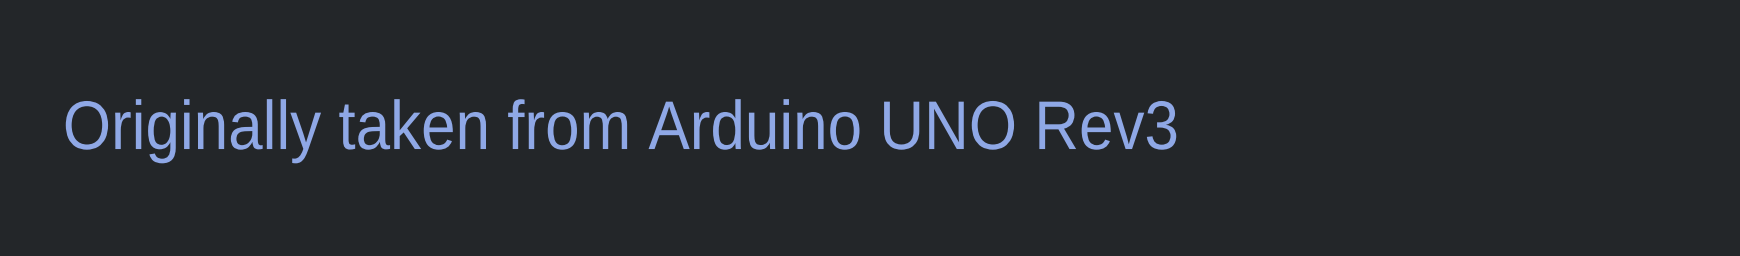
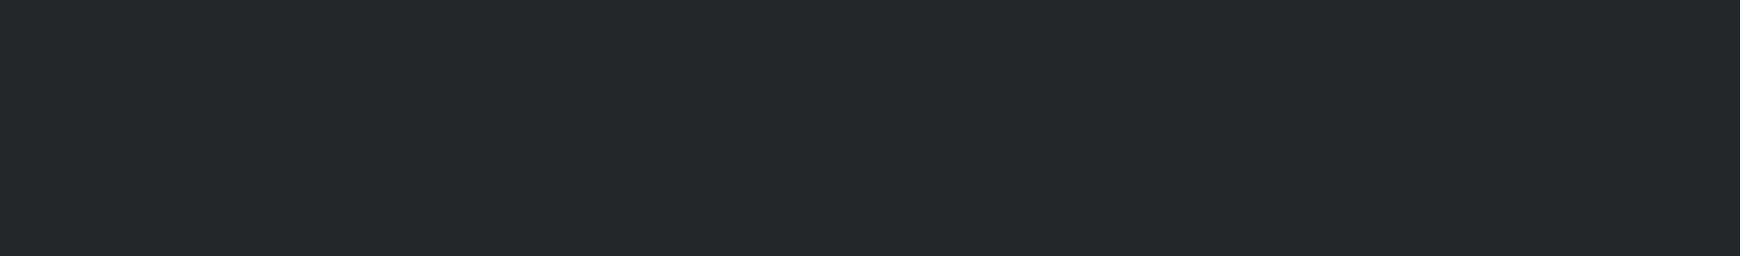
text: Originally taken from Arduino UNO Rev3 (621, 131) -> none

